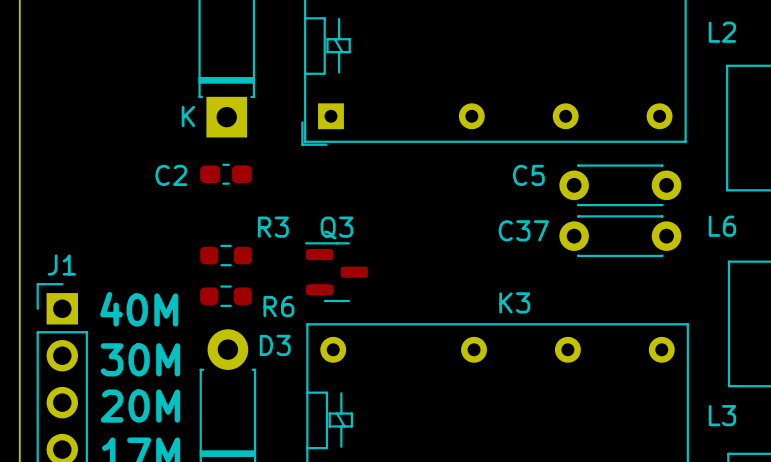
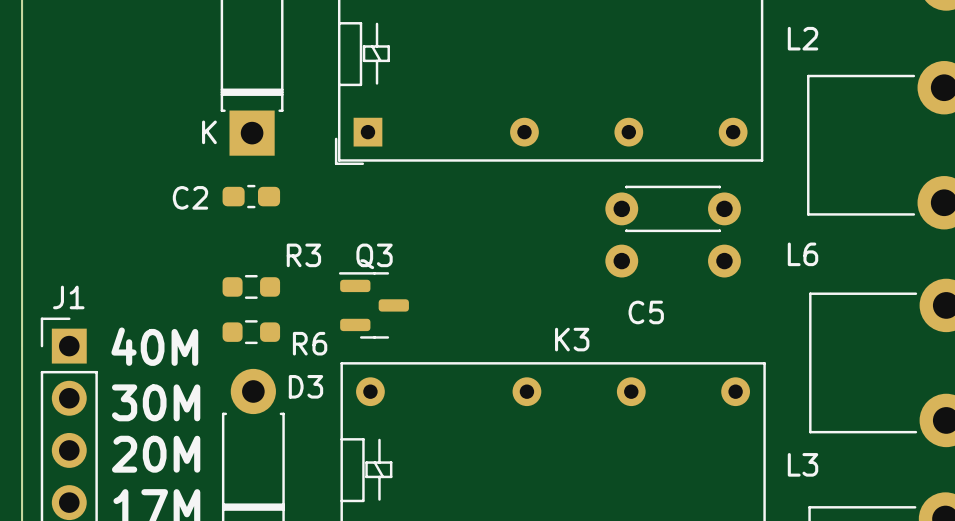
C5 footprint: [559, 164, 682, 207] -> [605, 185, 741, 278]
C5 name position: C5 (528, 175) -> C5 (646, 312)
C37: (620, 236) -> none

